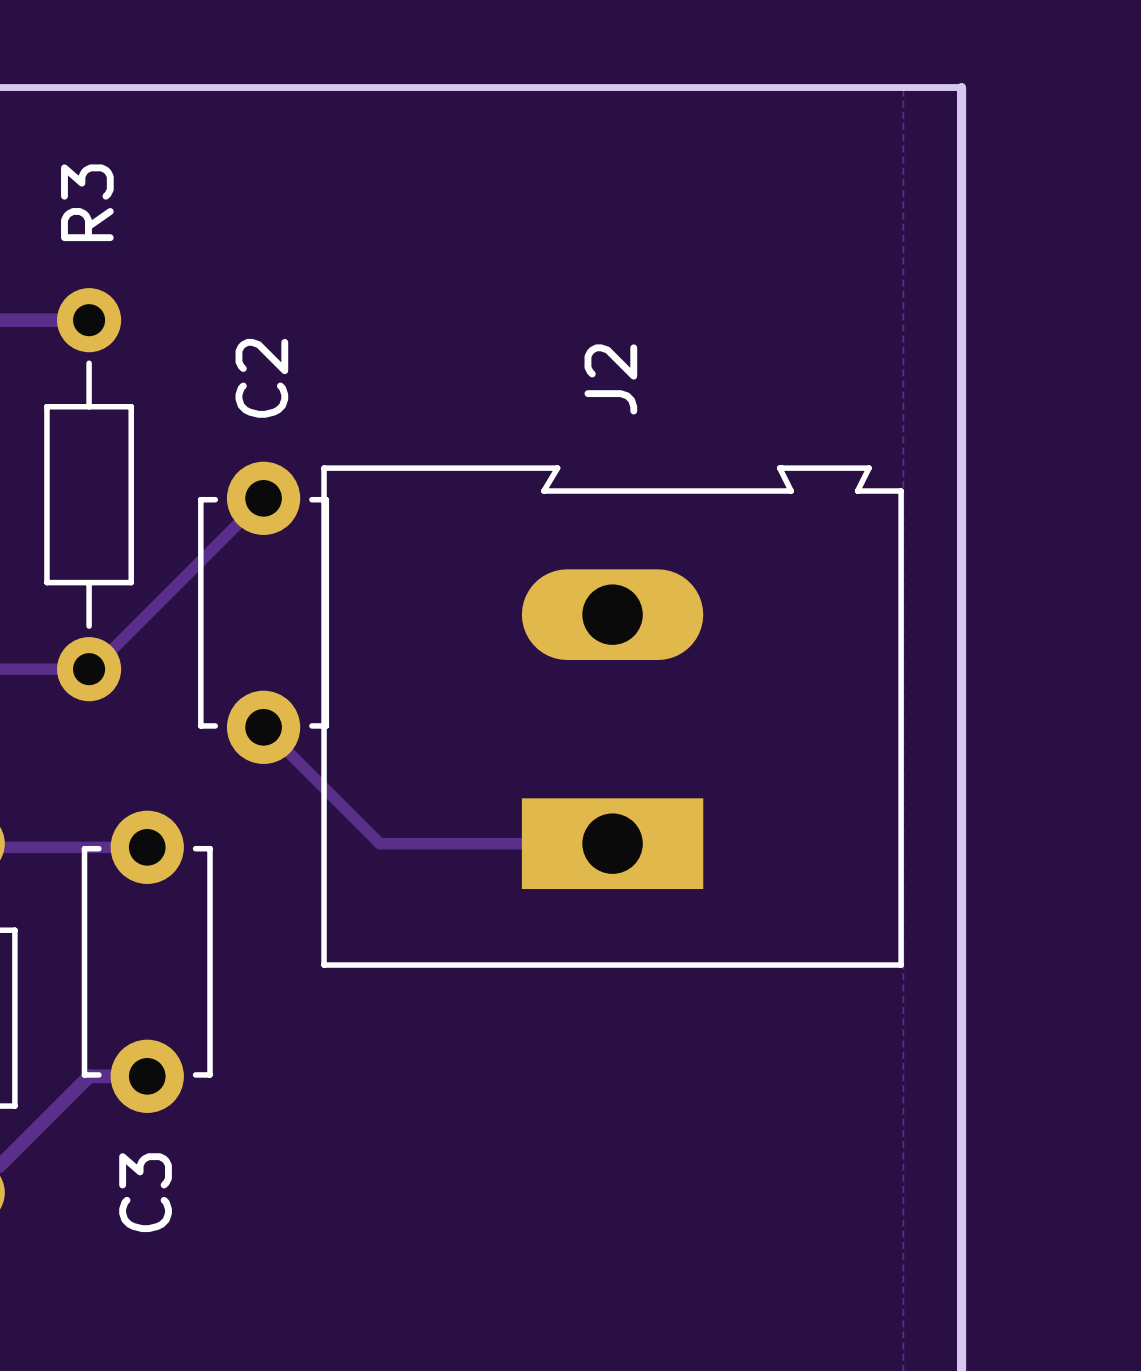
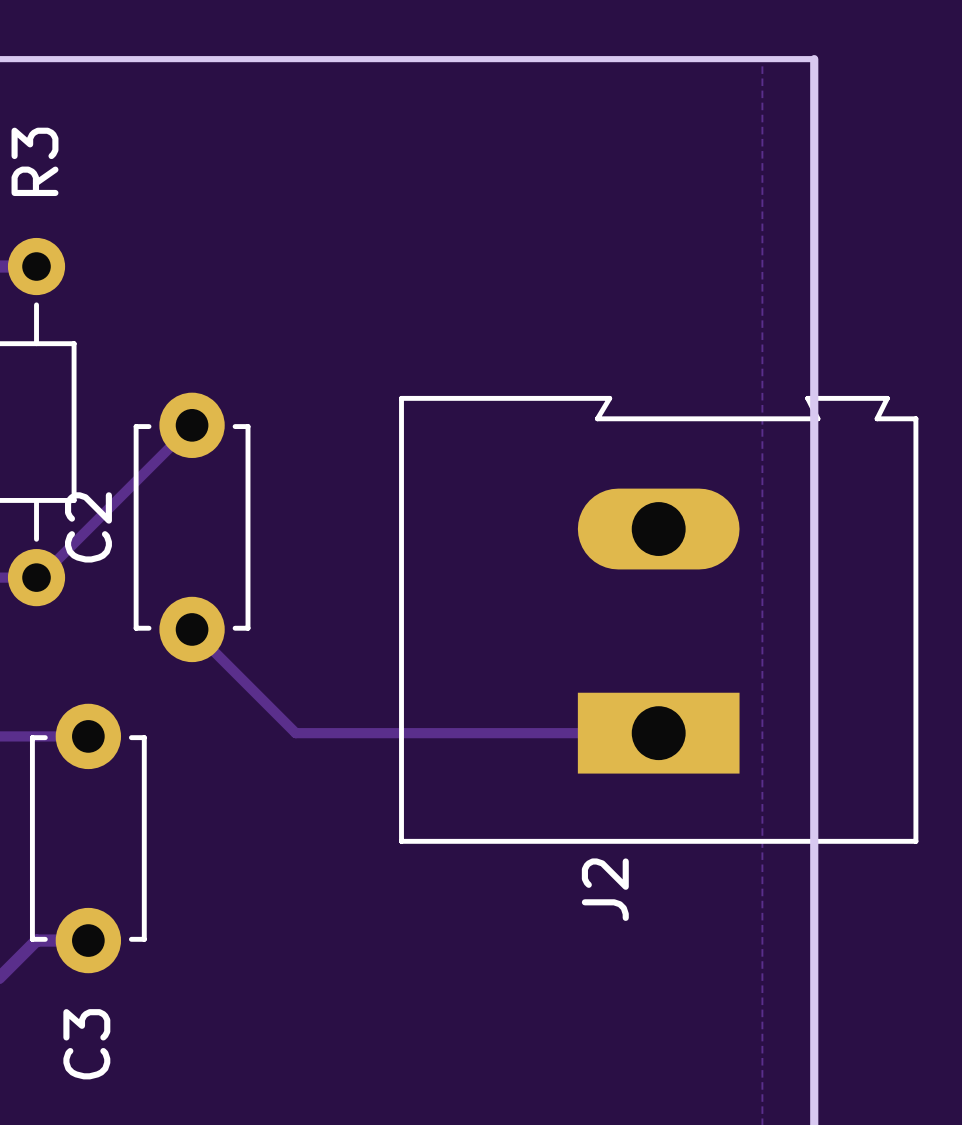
C2 name position: C2 (261, 378) -> C2 (88, 527)
J2 name position: J2 (610, 379) -> J2 (605, 889)
J2 position: (612, 716) -> (658, 619)
track: none -> (503, 733) (658, 733)

